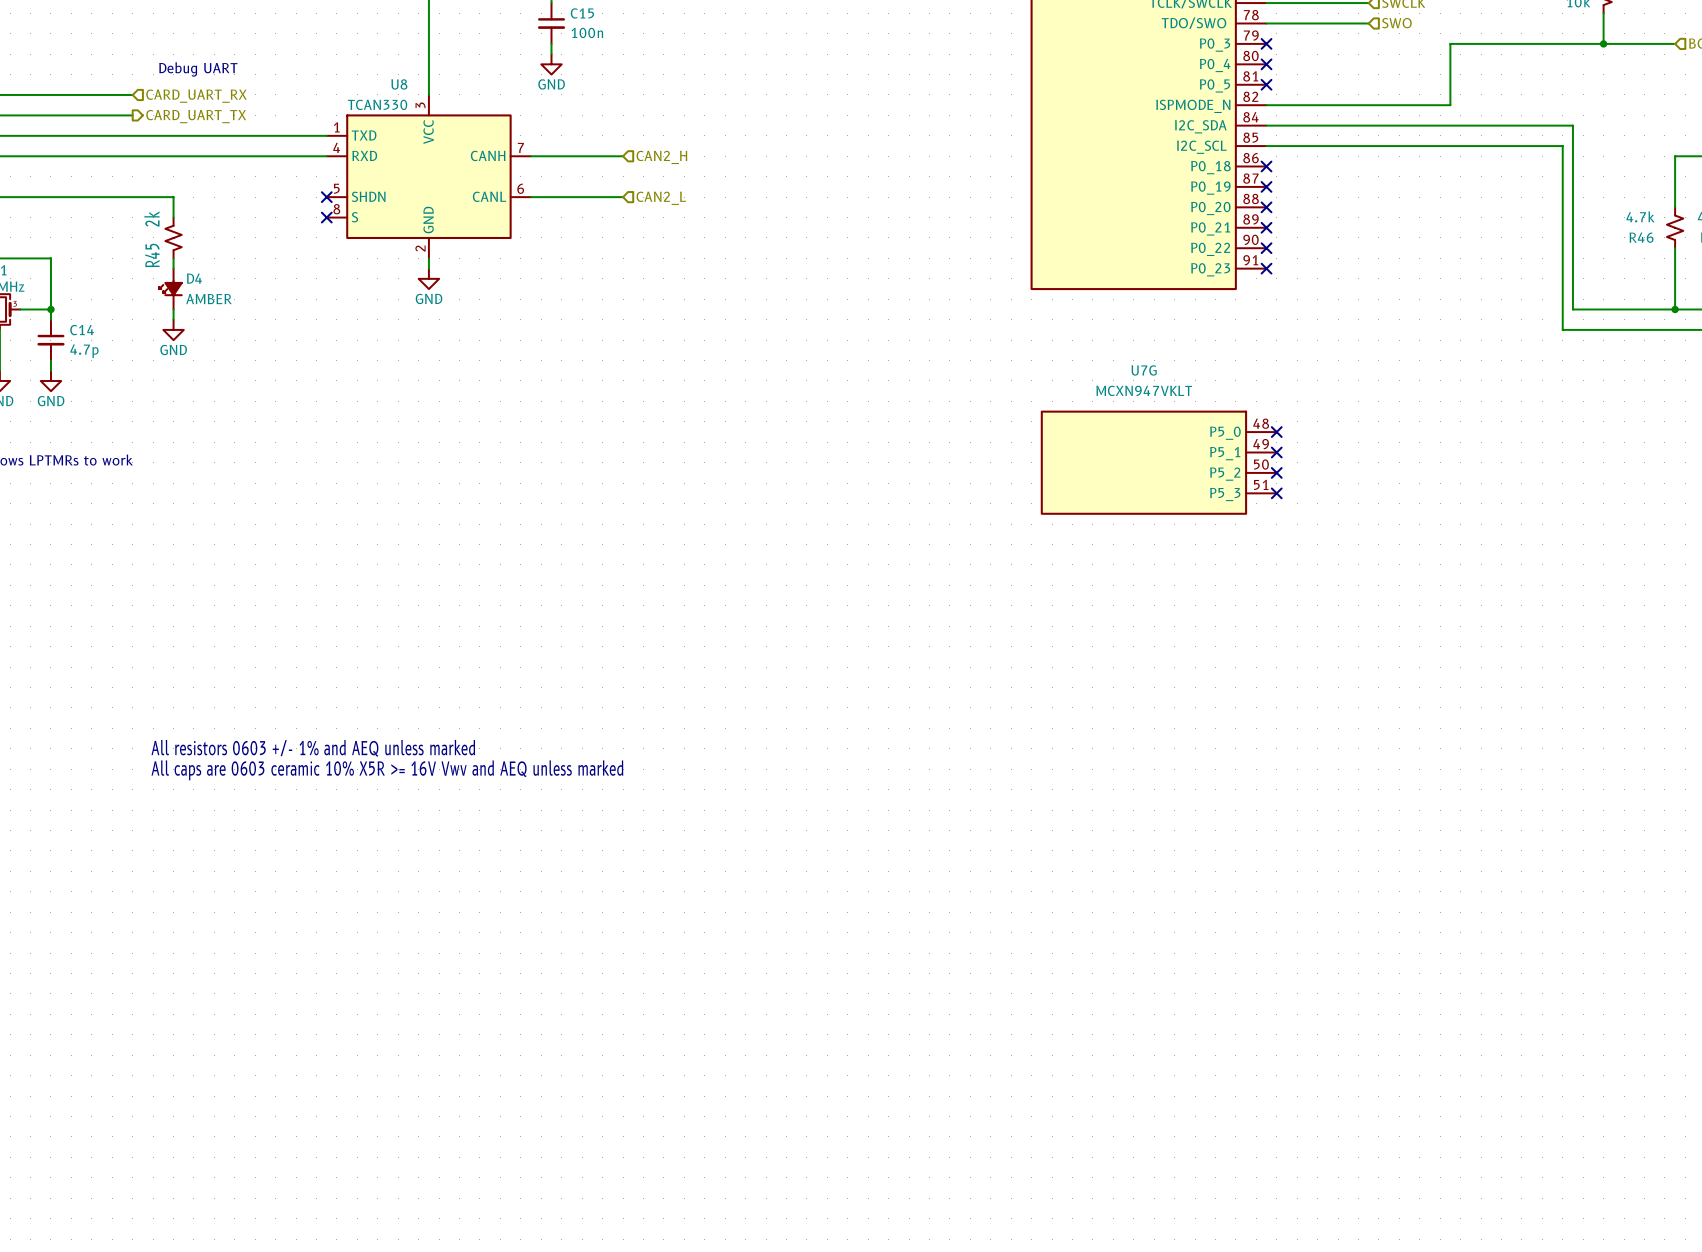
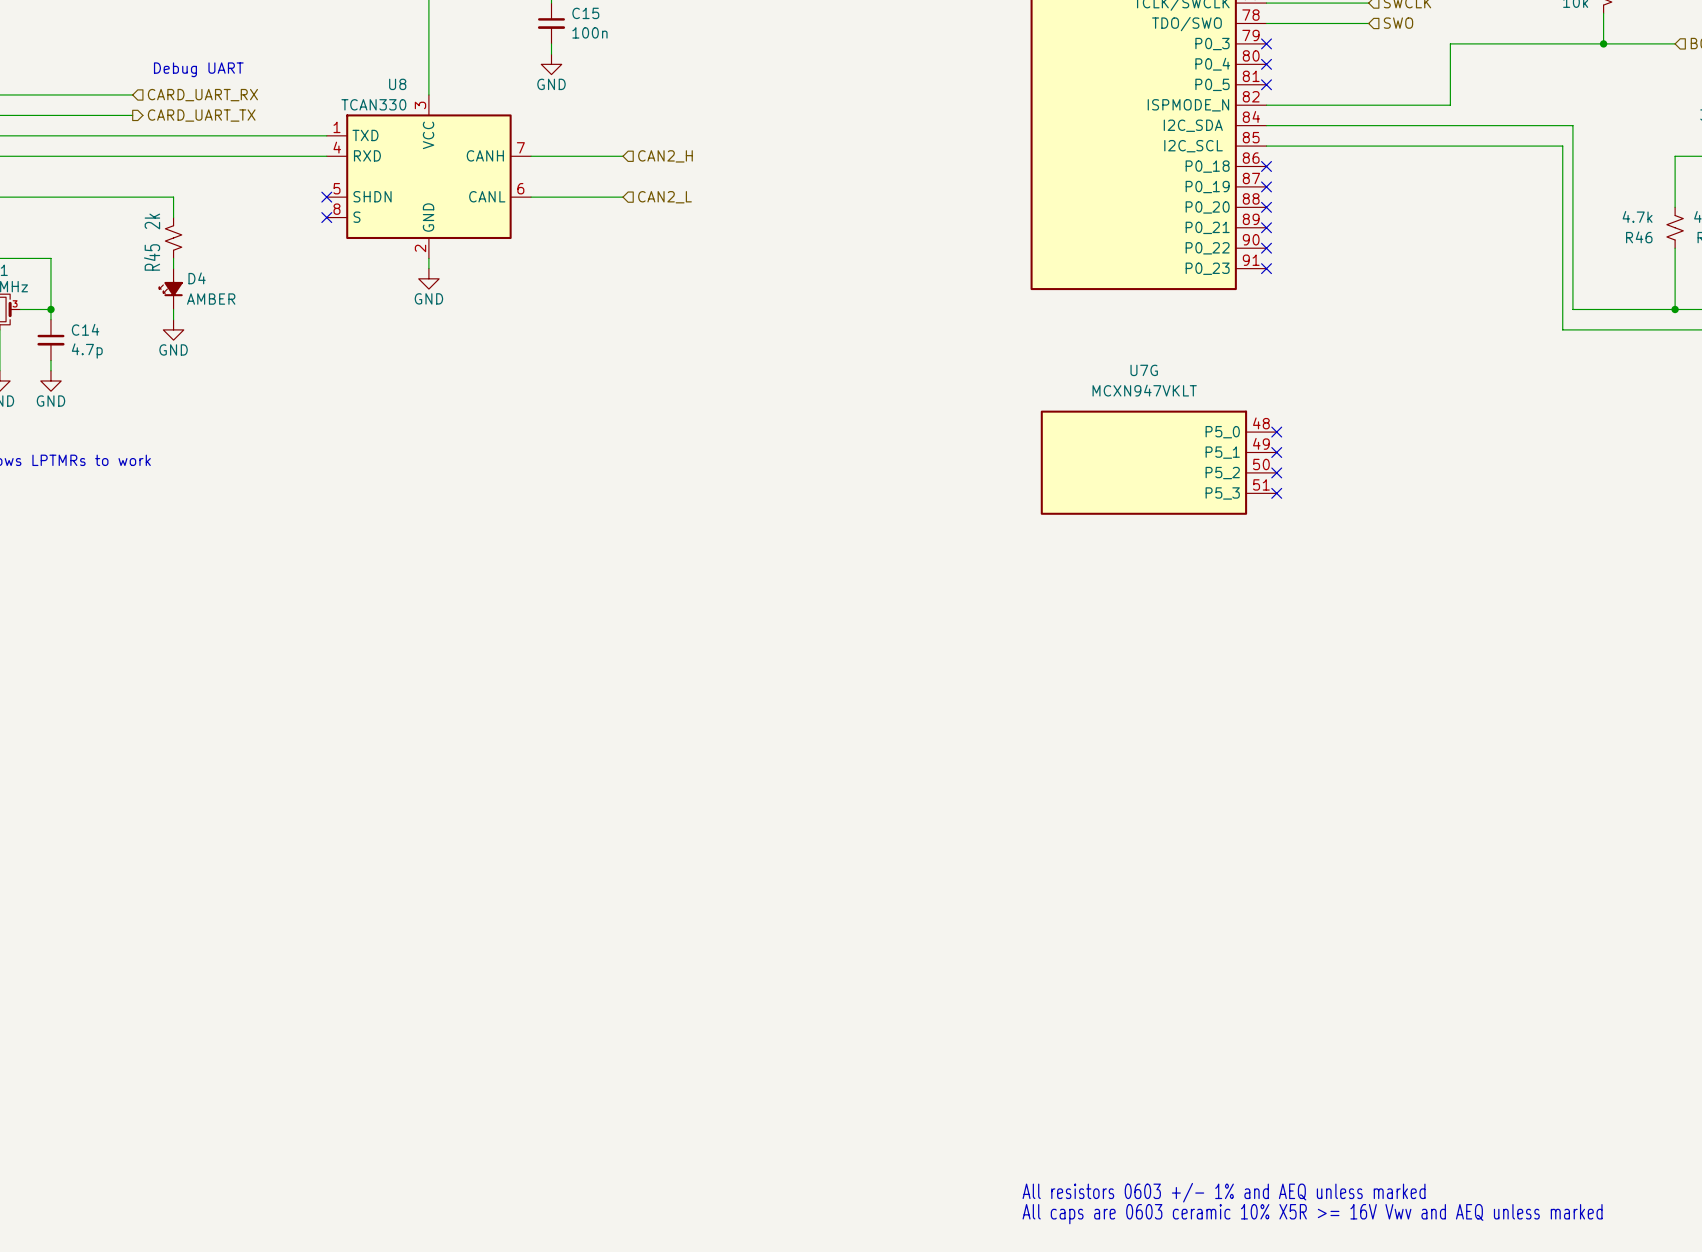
text: All resistors 0603 +/- 1% and AEQ unless marked (313, 748) -> none
text: All caps are 0603 ceramic 10% X5R >= 16V Vwv and AEQ unless marked (387, 770) -> none
text: none -> All resistors 0603 +/- 1% and AEQ unless marked (1224, 1192)
text: none -> All caps are 0603 ceramic 10% X5R >= 16V Vwv and AEQ unless marked (1312, 1214)

